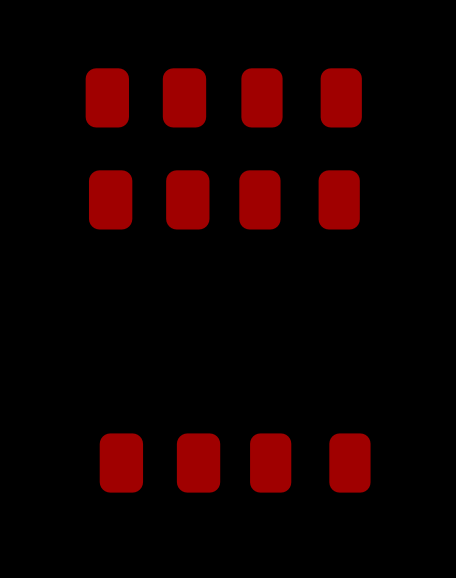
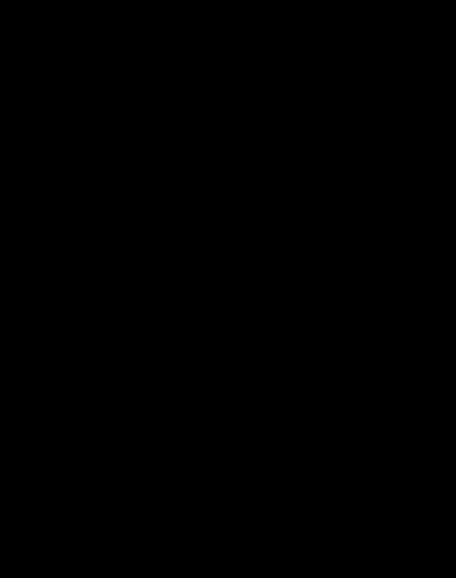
part: (145, 97) -> none
part: (301, 97) -> none
part: (149, 199) -> none
part: (299, 199) -> none
part: (159, 463) -> none
part: (310, 463) -> none

